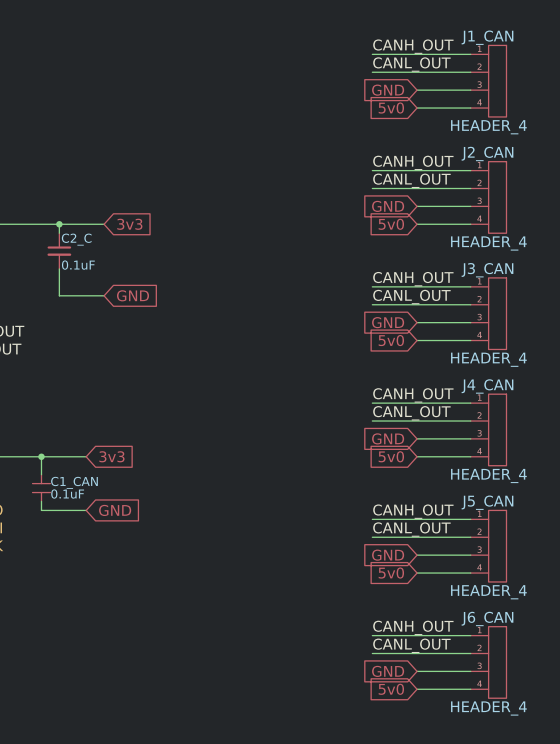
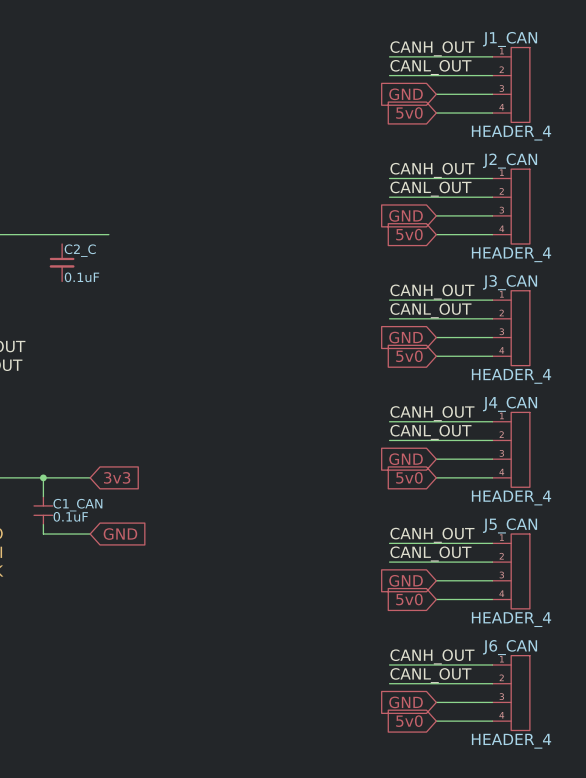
wire: (59, 224) (59, 233) -> none
junction: (59, 224) -> none
global label: 3v3 (129, 224) -> none
wire: (59, 268) (59, 295) (104, 295) -> none
global label: GND (133, 295) -> none

